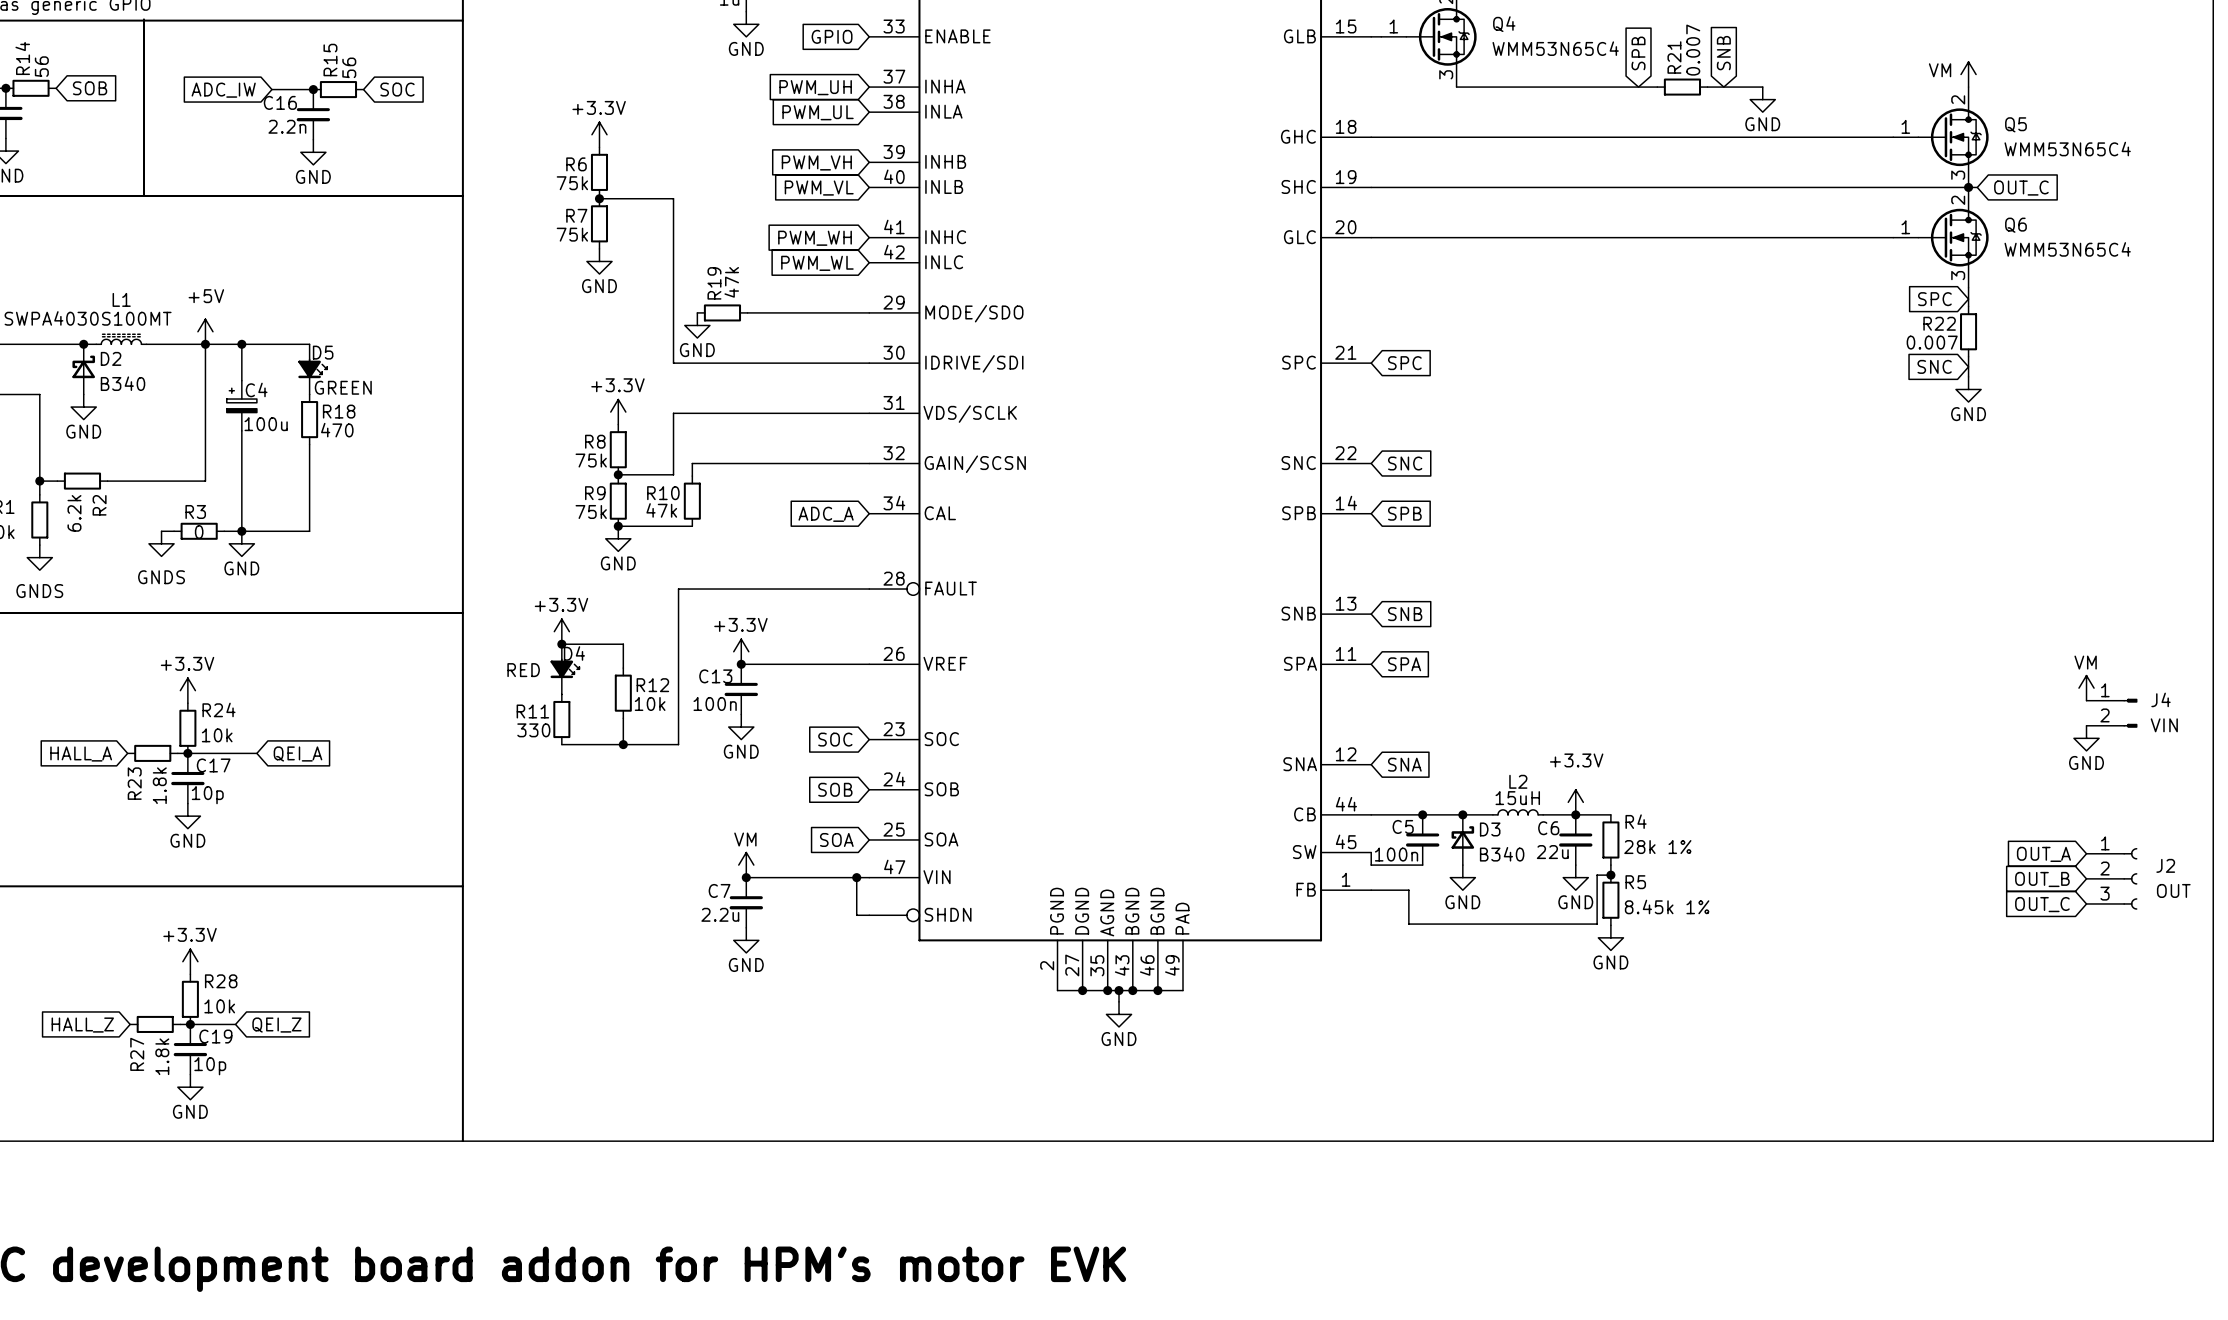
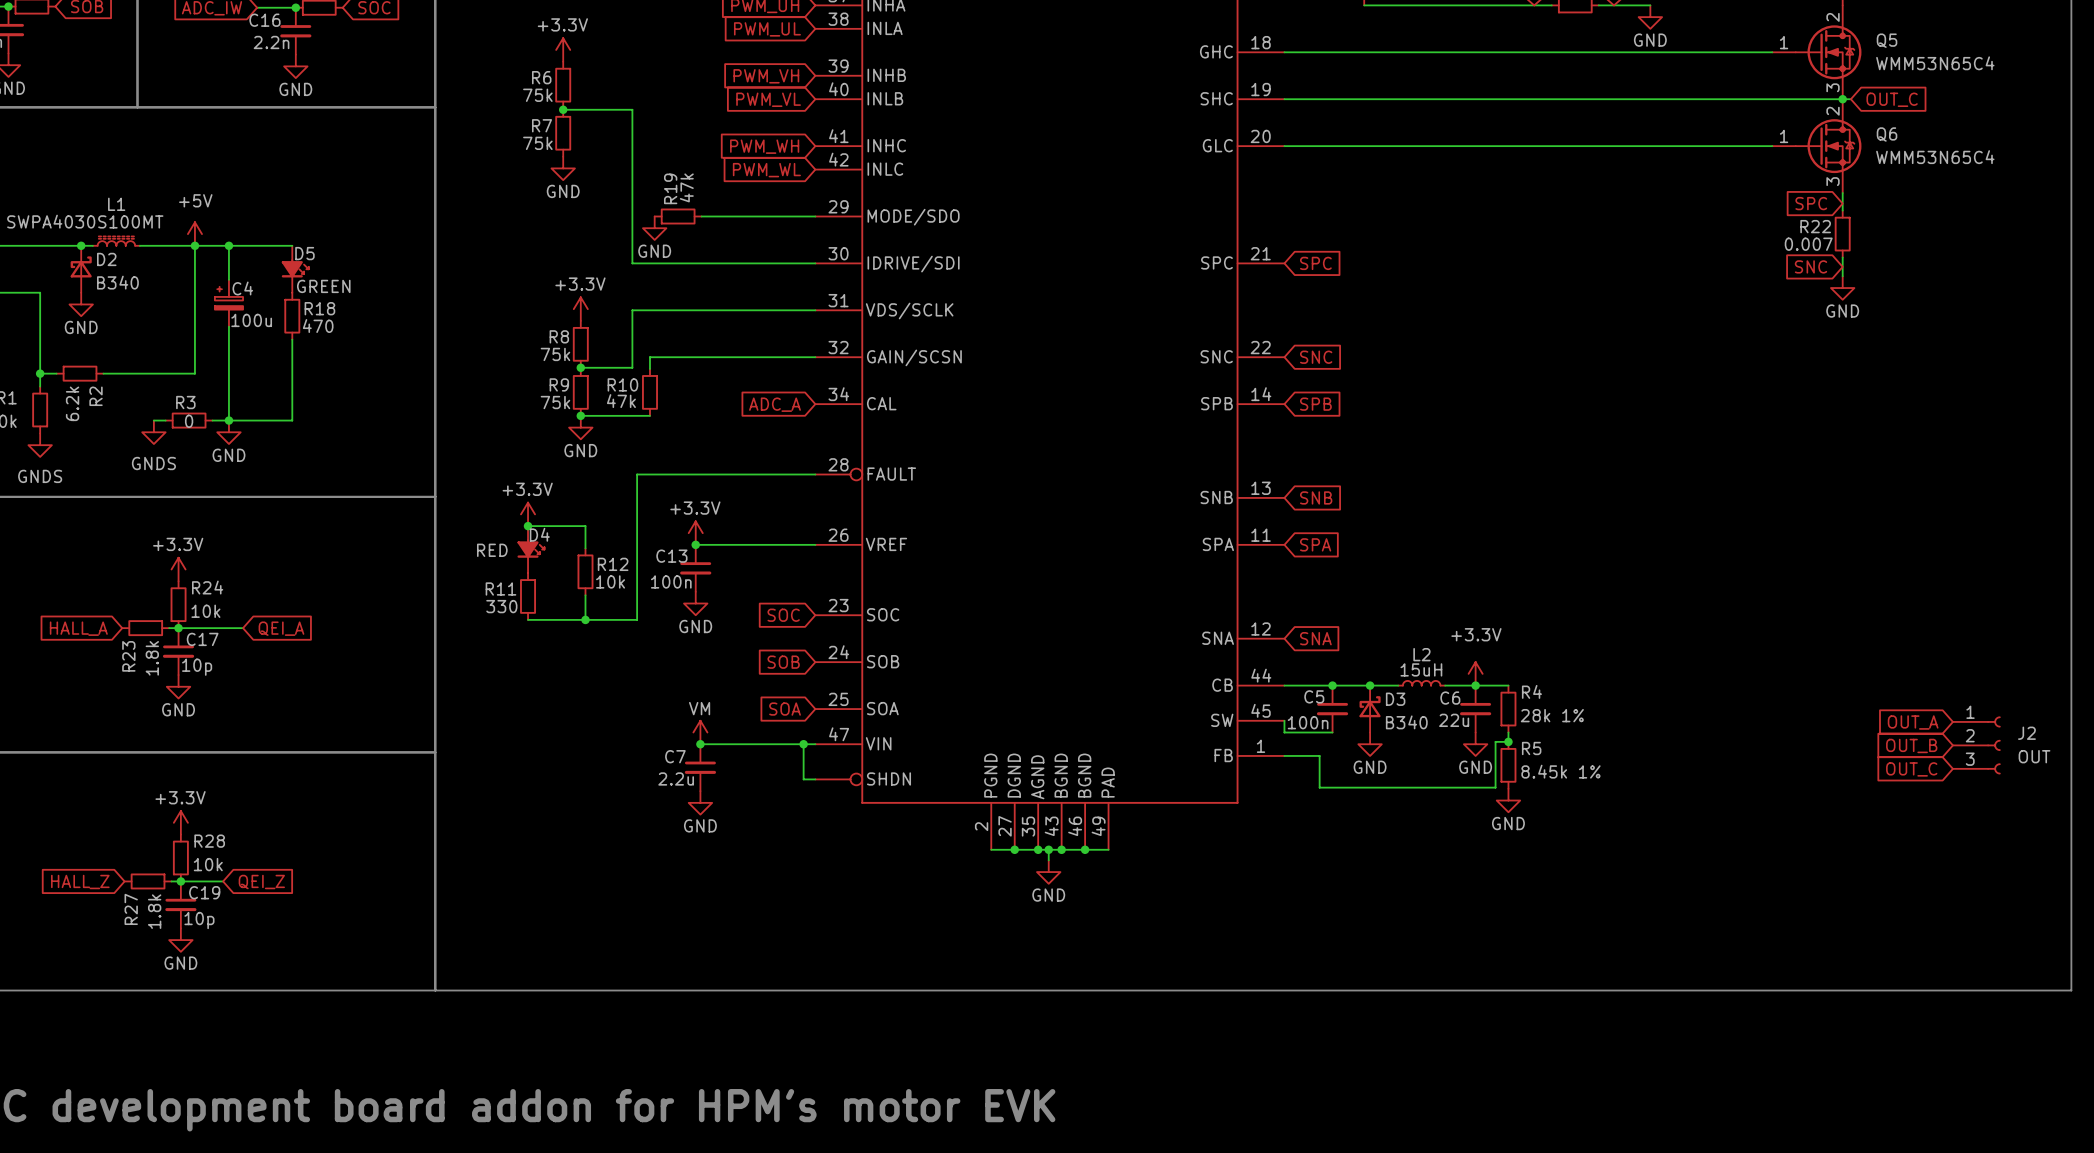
power symbol: VM (2086, 688) -> none
J4: VIN (2111, 713) -> none
power symbol: GND (2086, 738) -> none

